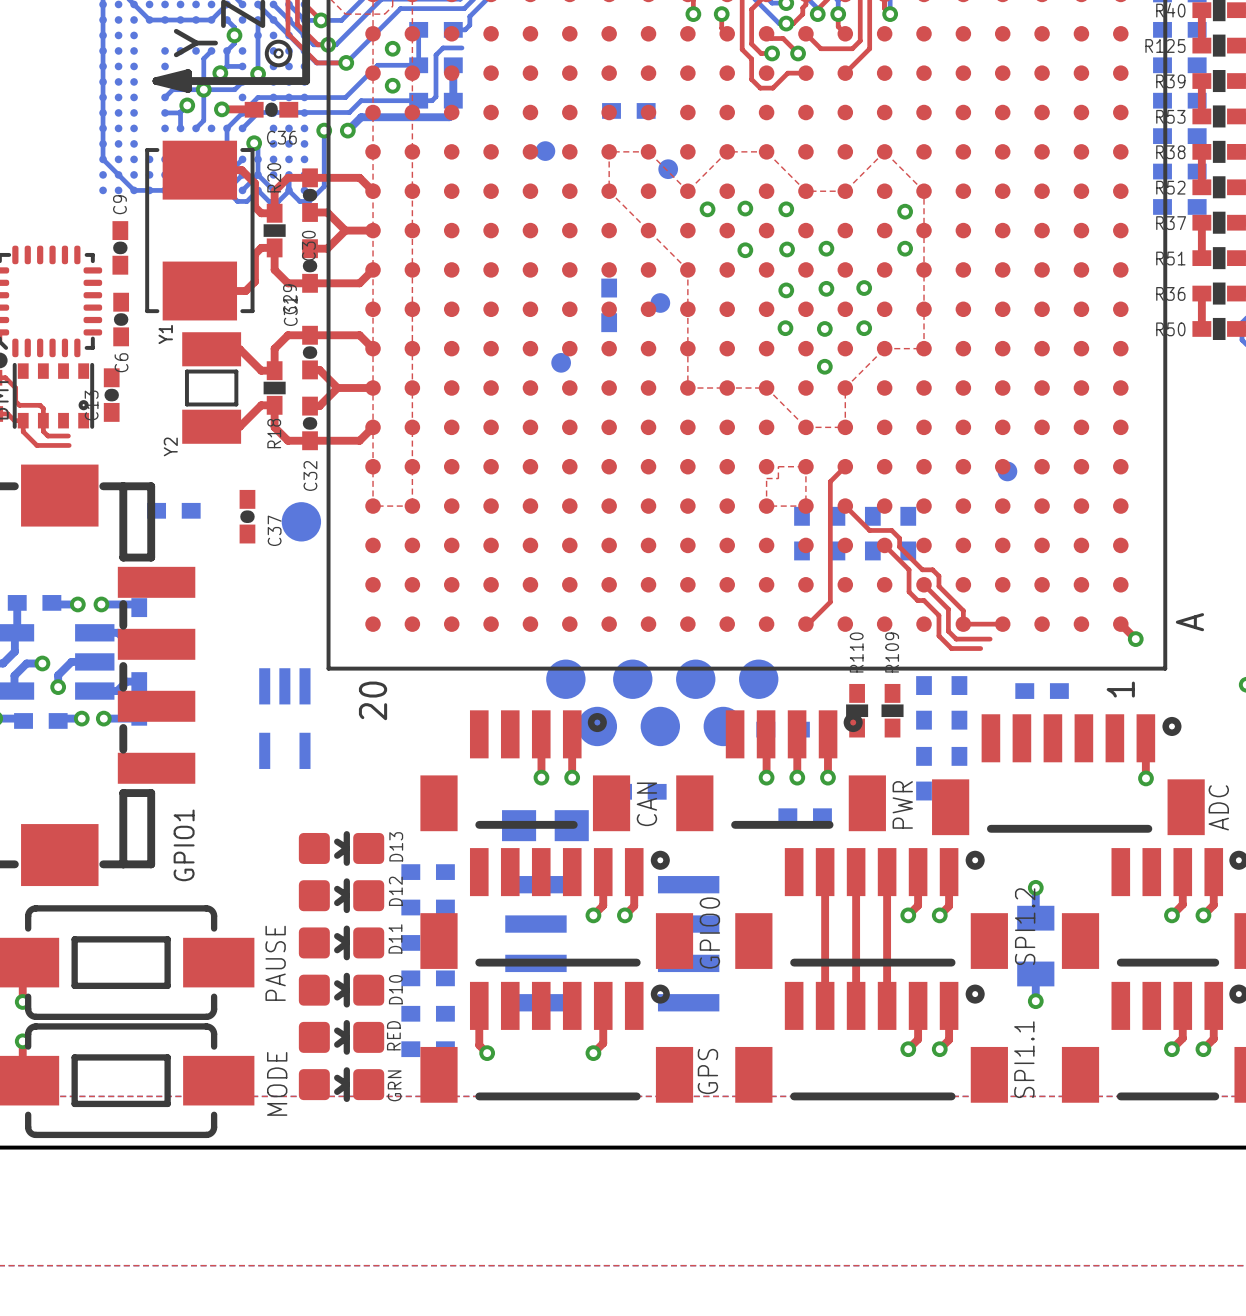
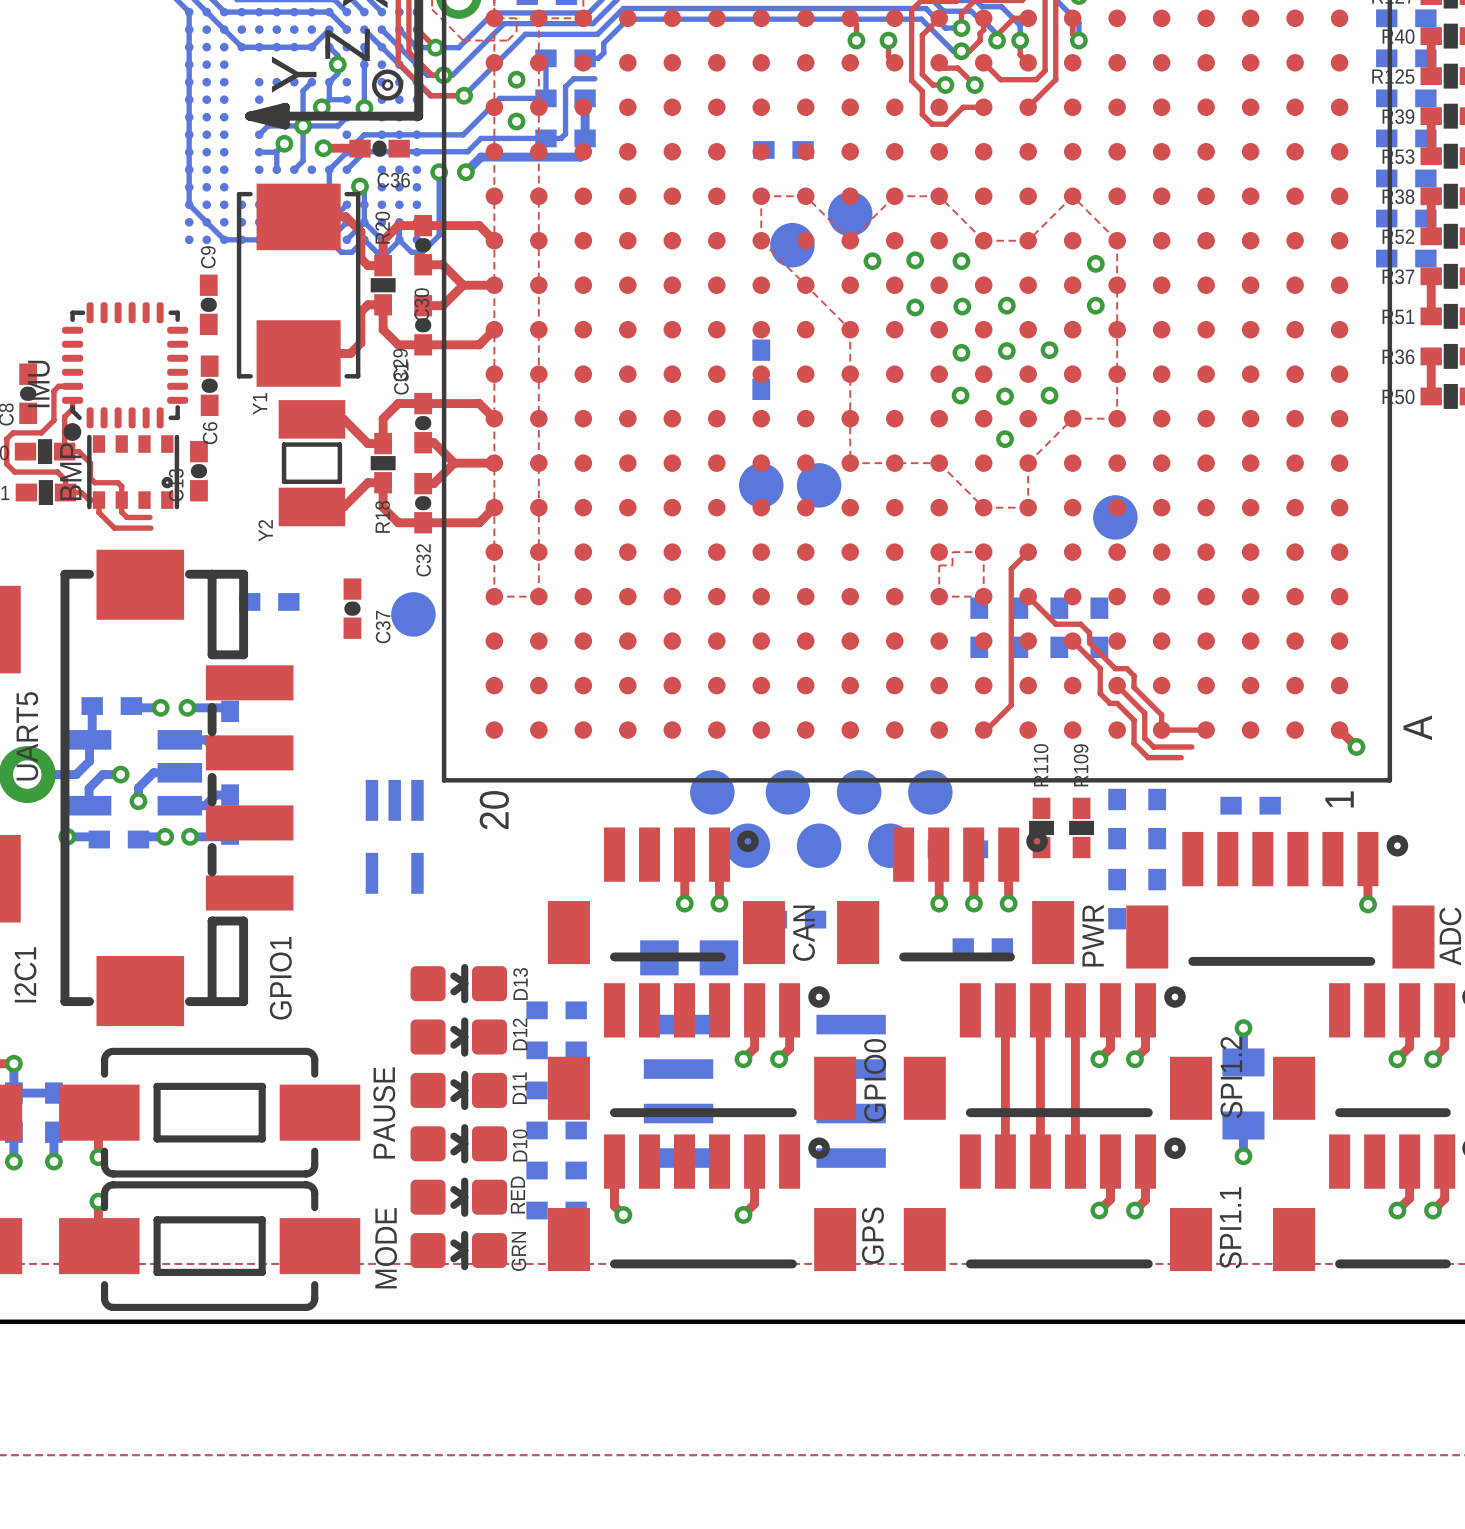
part: (545, 151) -> none
part footprint: [658, 159, 679, 180] -> [827, 191, 873, 237]
part: none -> (792, 245)
part: (660, 302) -> none
part: (561, 362) -> none
part: none -> (761, 485)
part: none -> (819, 485)
part: none -> (1115, 517)
part: (1007, 471) -> none

